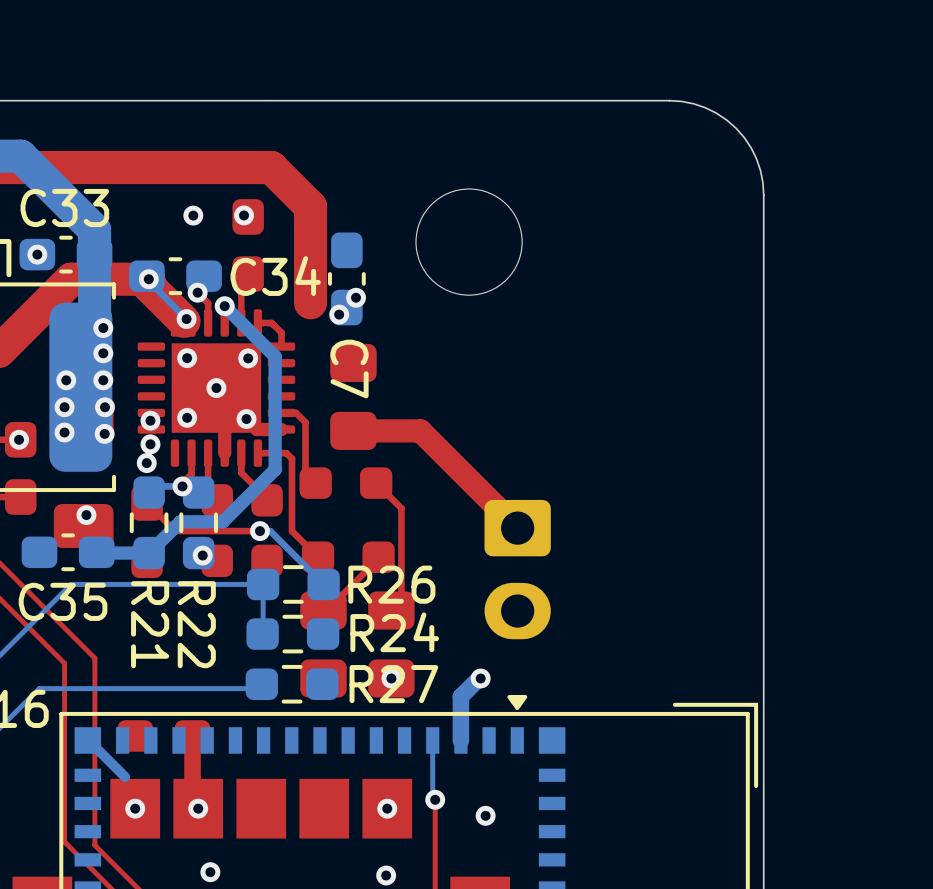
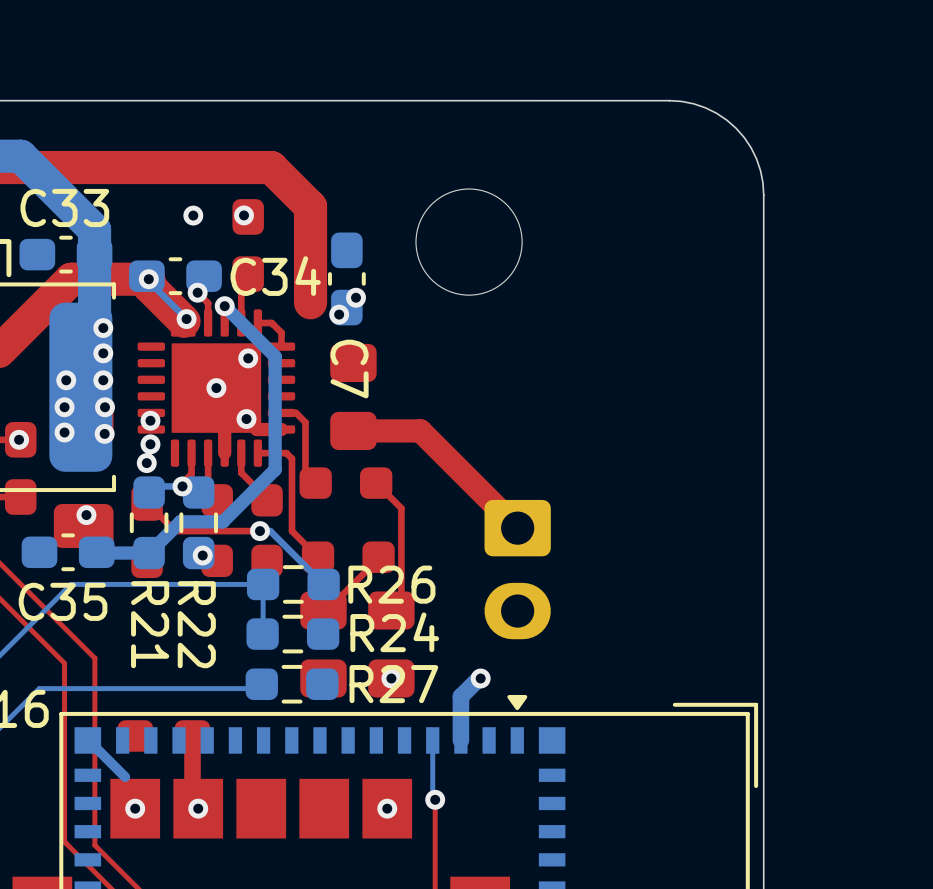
via: (37, 254) -> none
via: (187, 358) -> none
via: (187, 417) -> none
via: (485, 815) -> none
via: (210, 872) -> none
via: (386, 875) -> none

